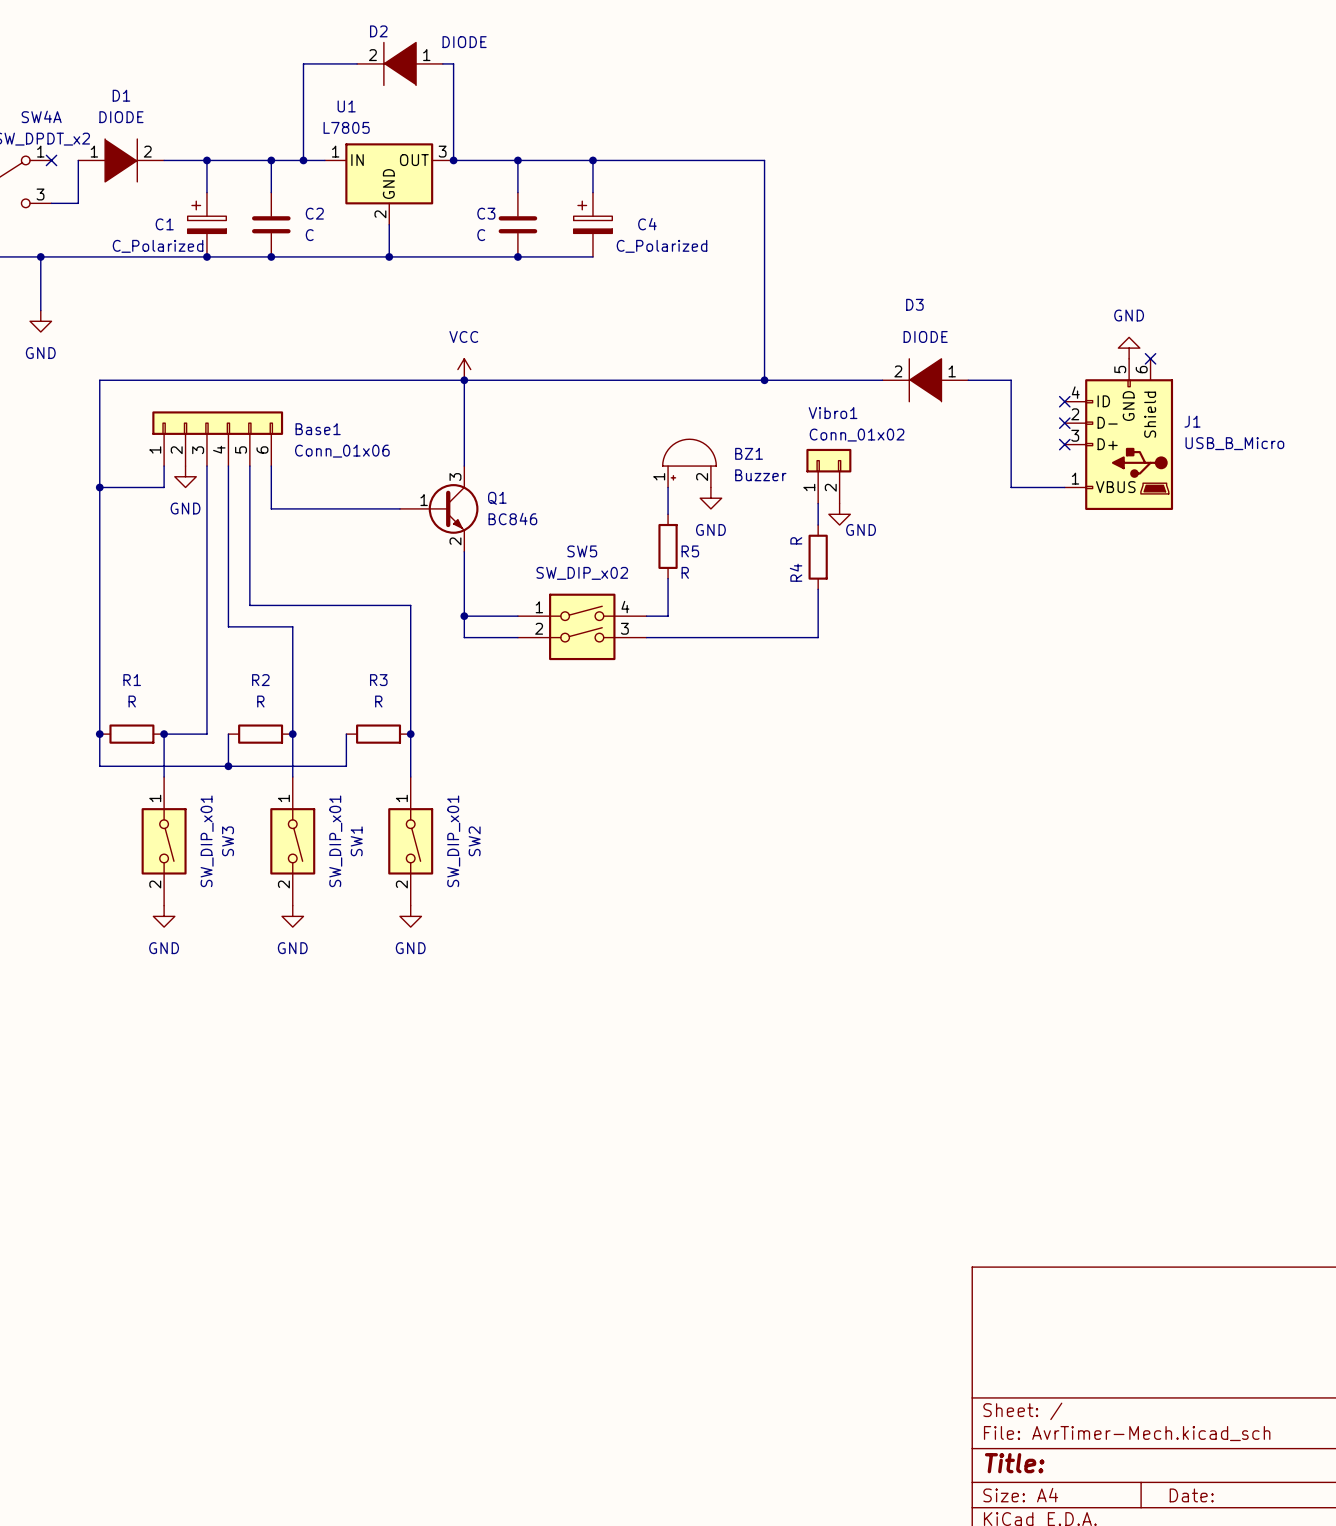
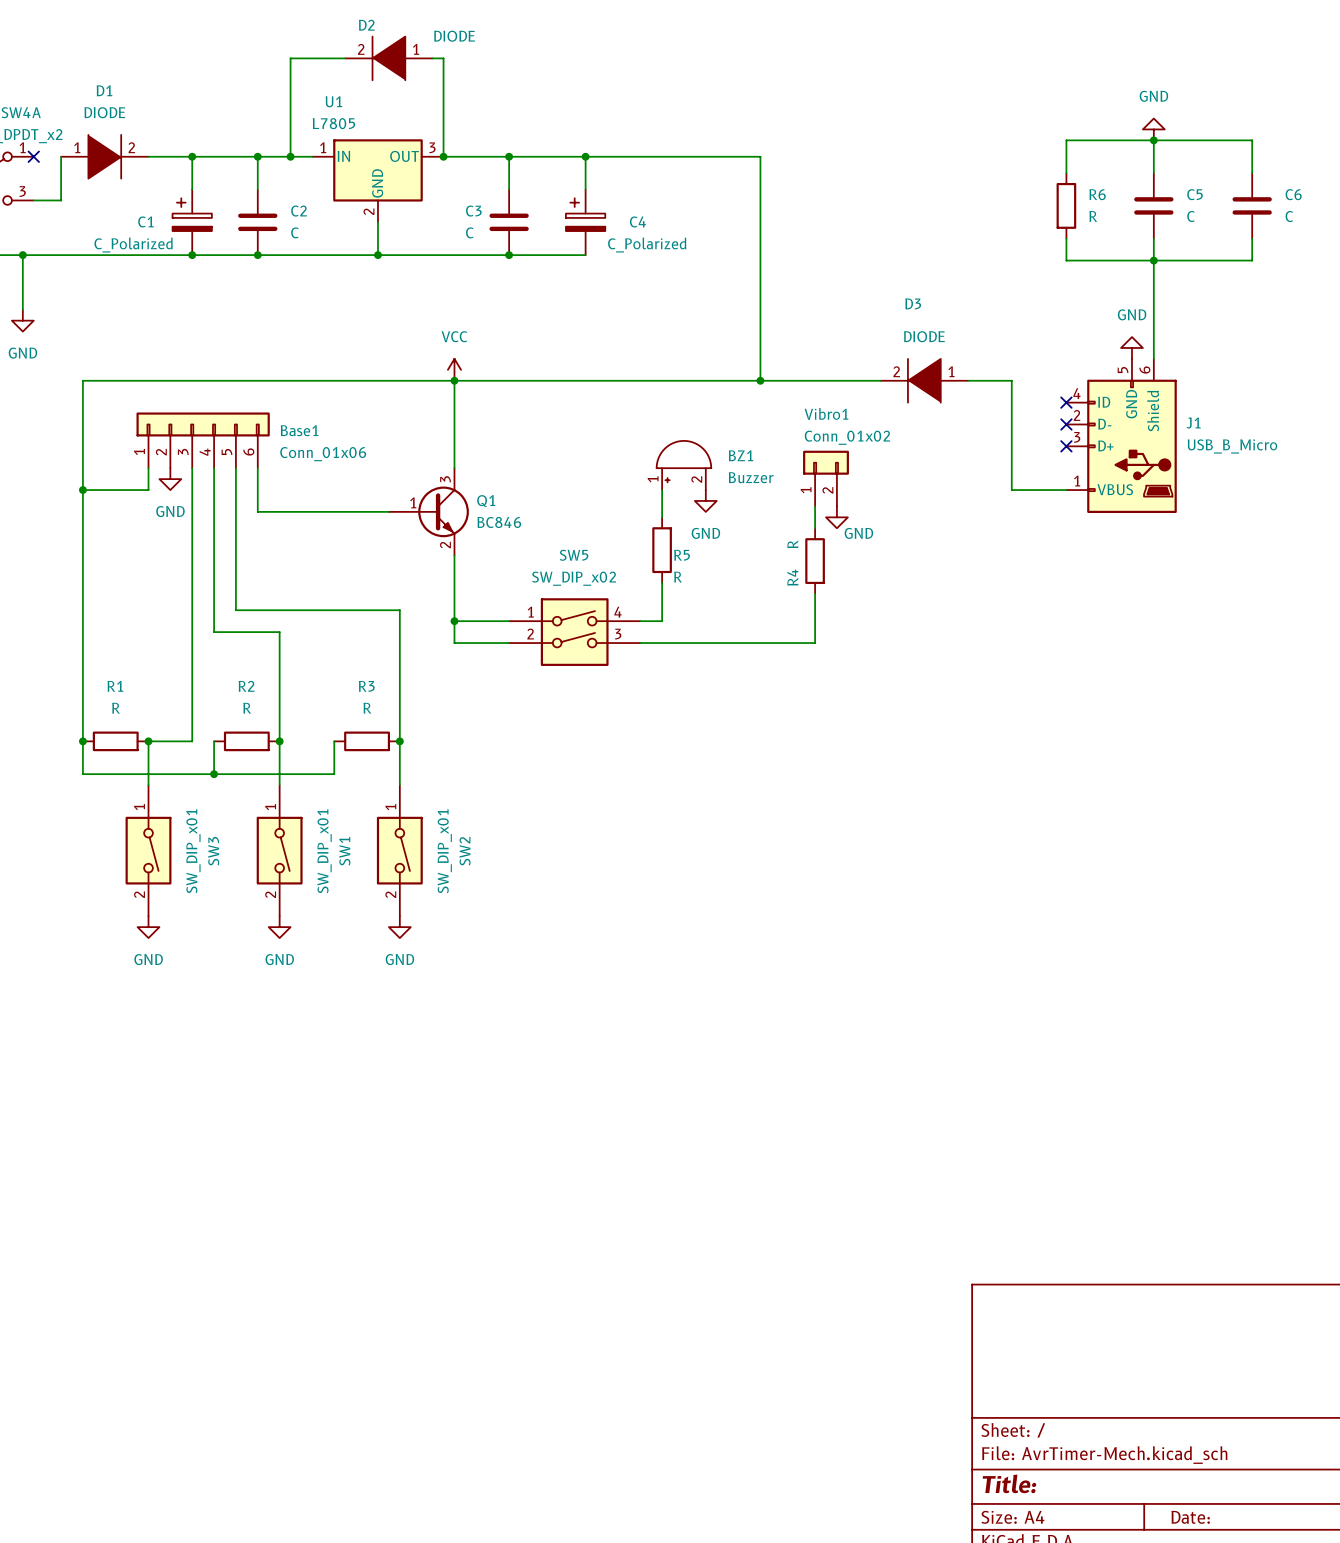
power symbol: none -> GND (1153, 129)
wire: none -> (1153, 140) (1153, 173)
junction: none -> (1153, 140)
wire: none -> (1066, 173) (1066, 140) (1252, 140) (1252, 173)
R6: none -> R (1066, 205)
C5: none -> C (1153, 205)
C6: none -> C (1252, 205)
wire: none -> (1066, 238) (1066, 260) (1252, 260) (1252, 238)
wire: none -> (1153, 238) (1153, 358)
junction: none -> (1153, 260)
no-connect mark: (1150, 358) -> none

